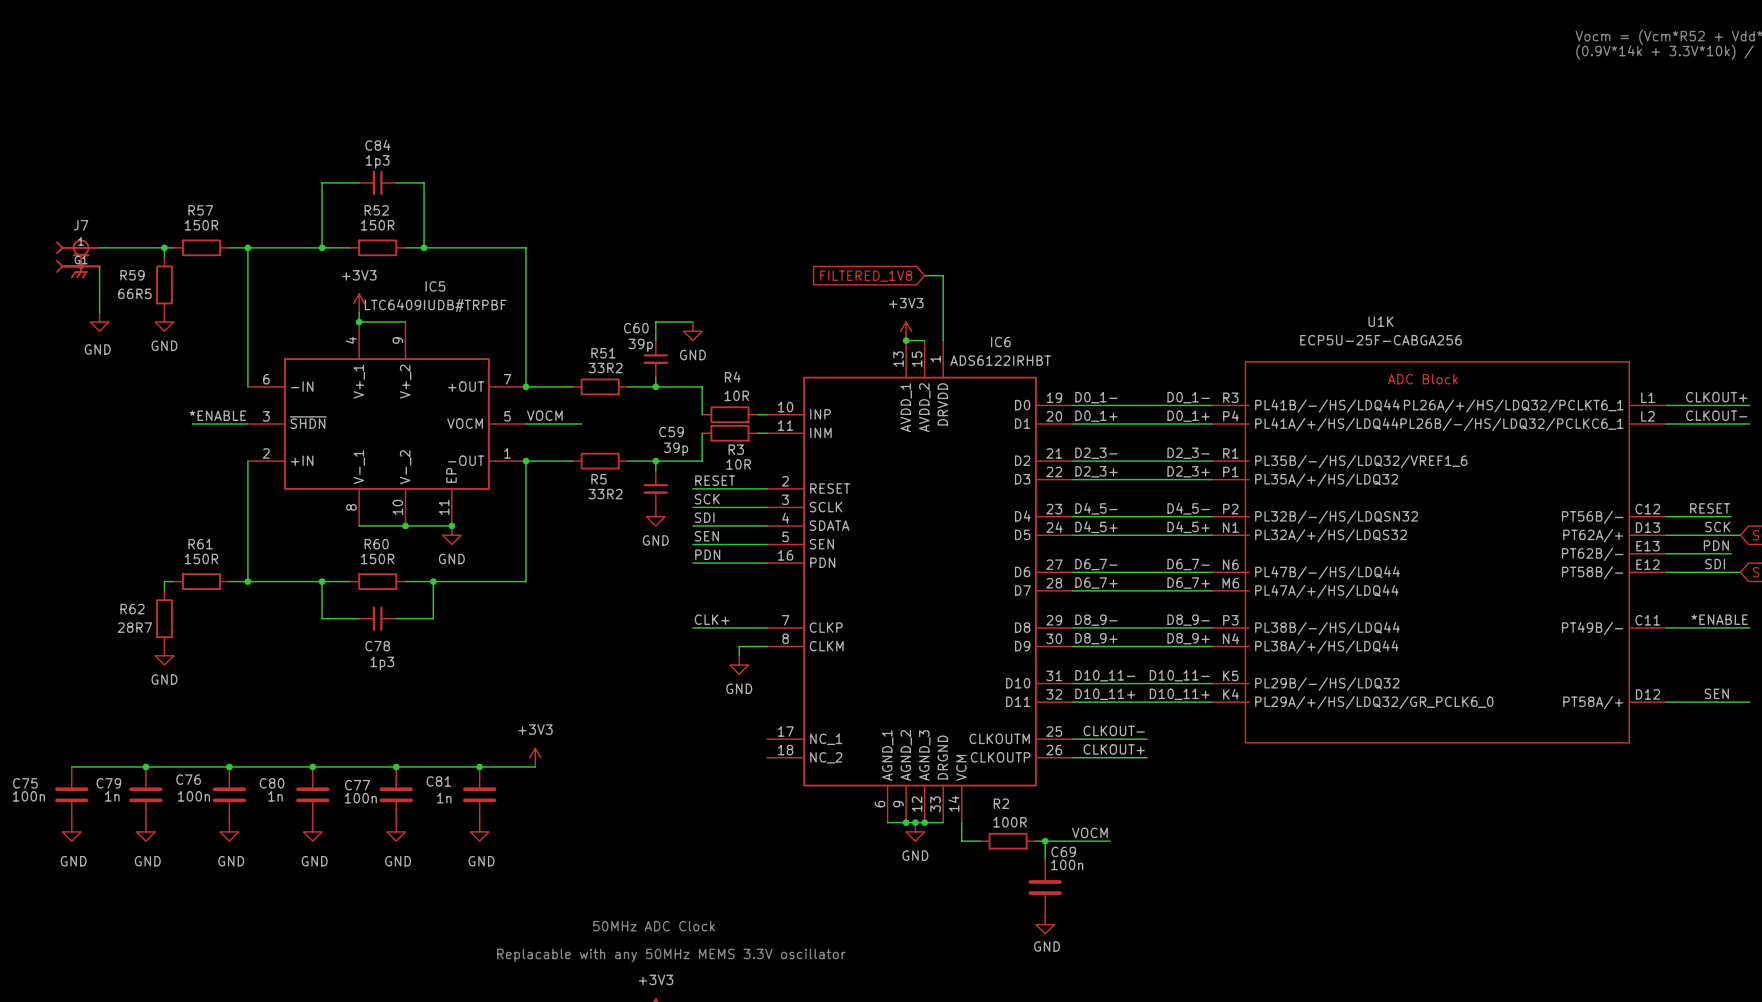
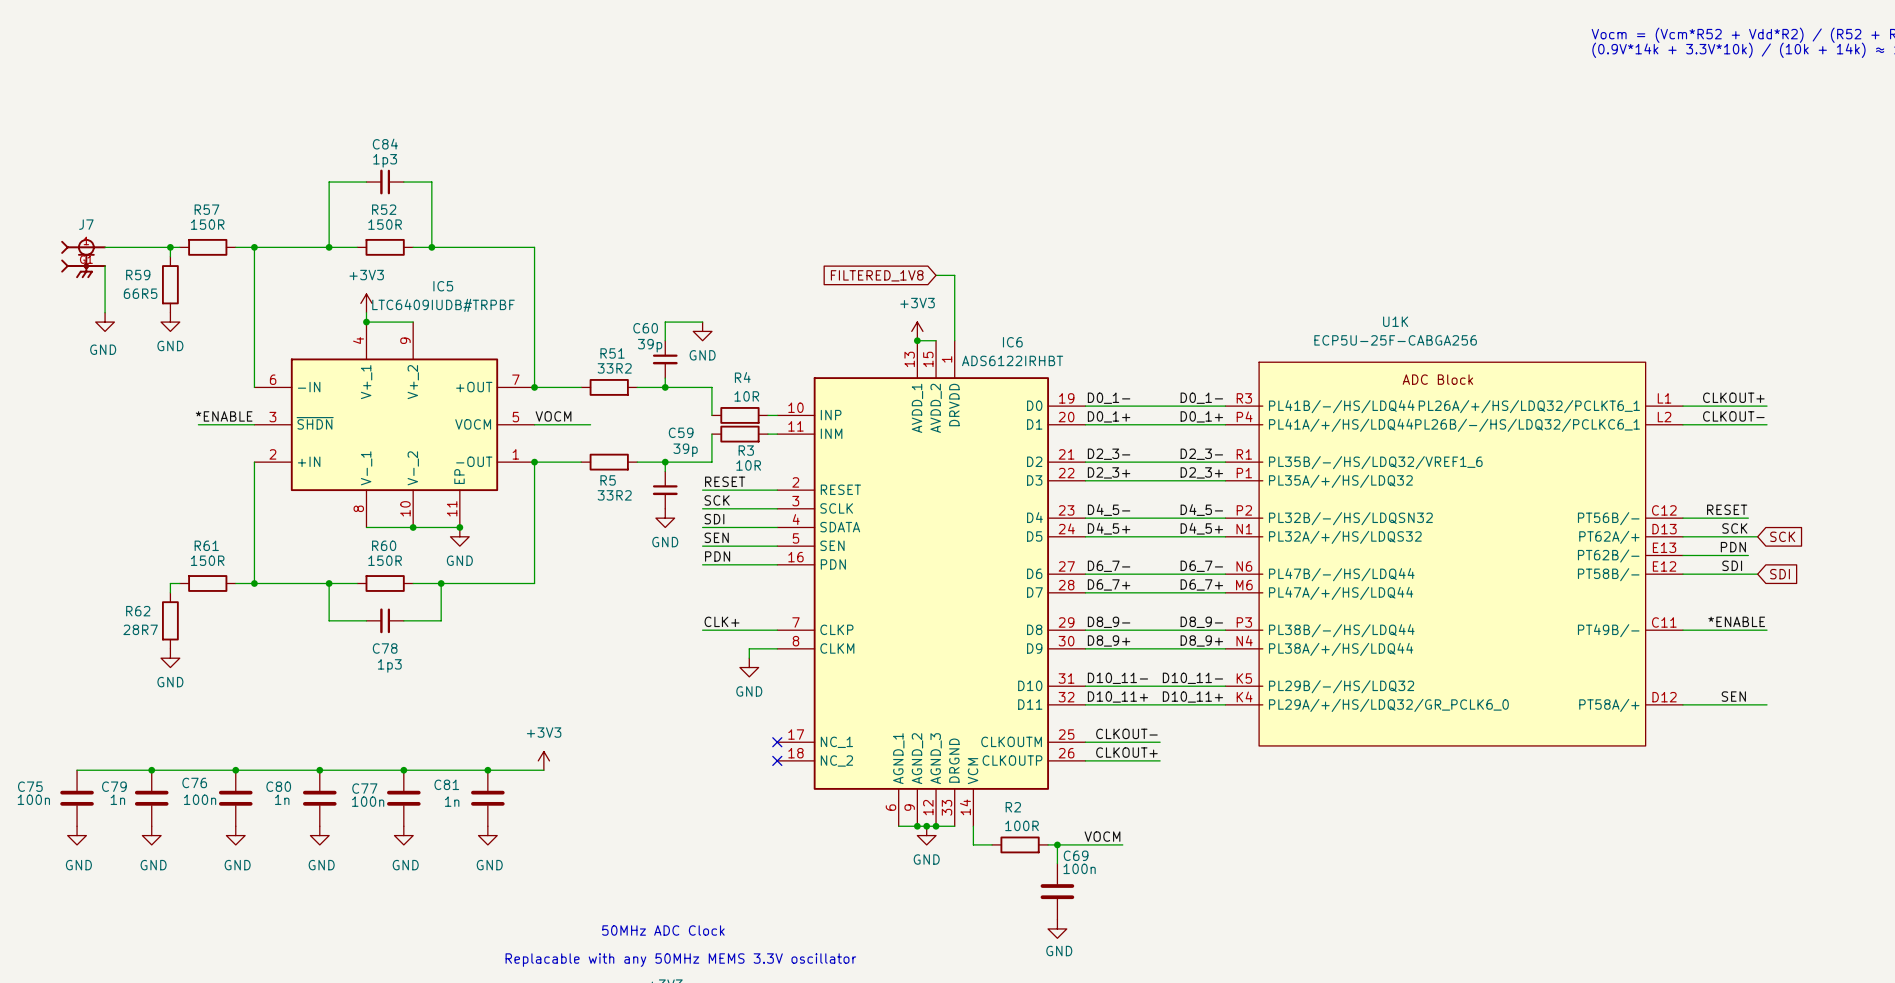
no-connect mark: none -> (777, 742)
no-connect mark: none -> (777, 760)

